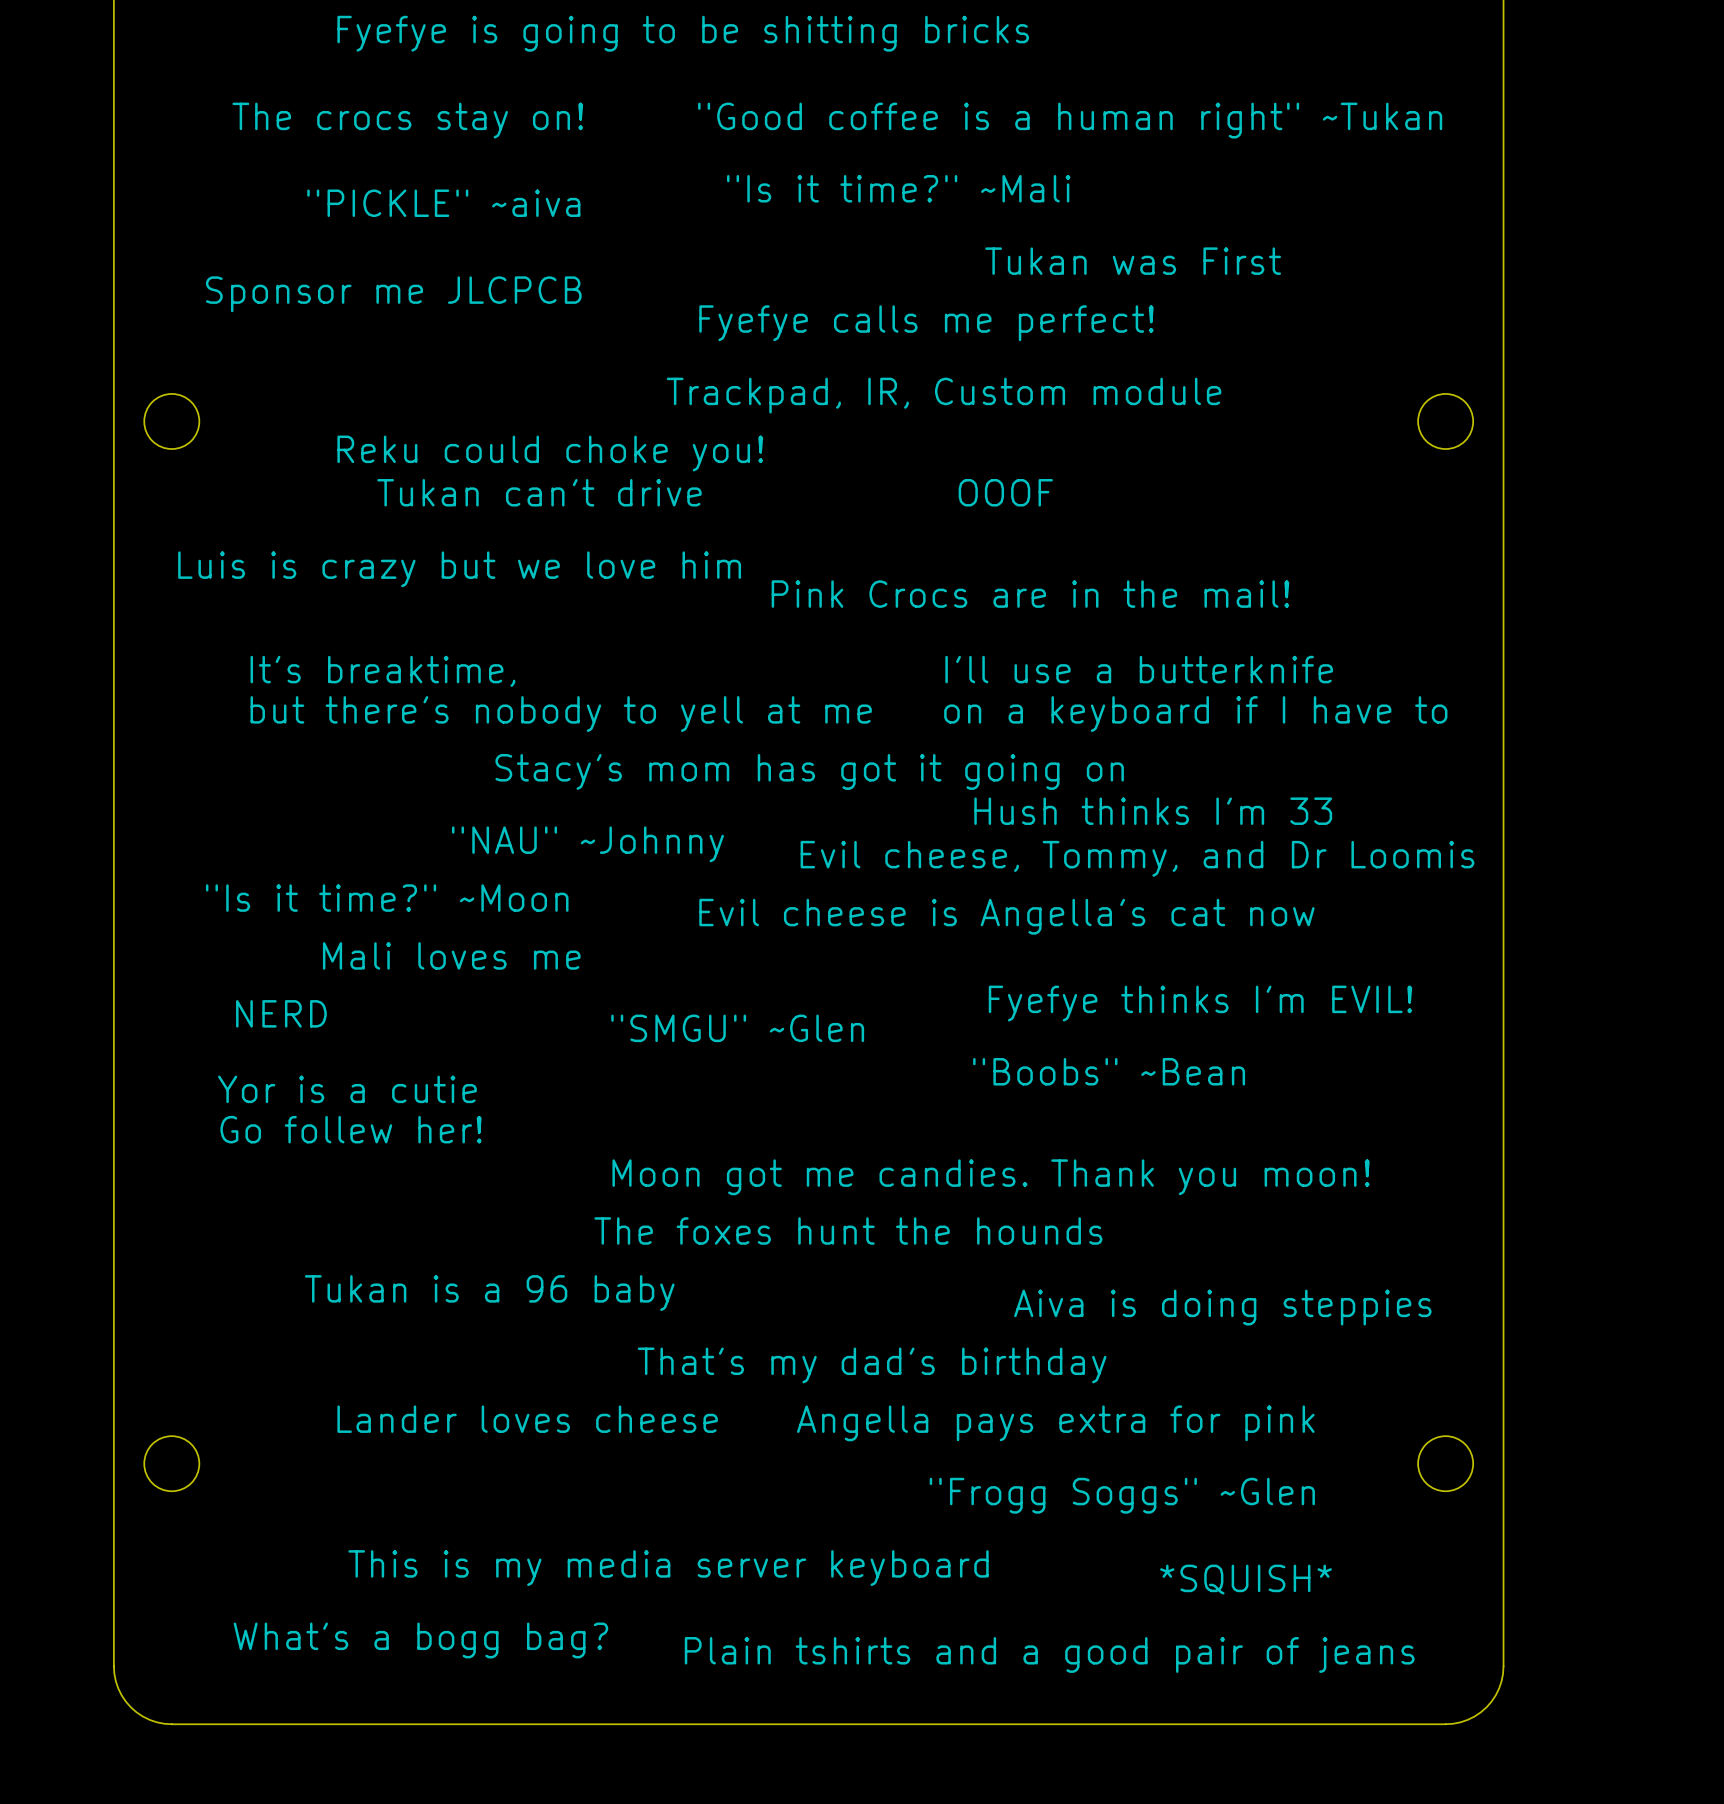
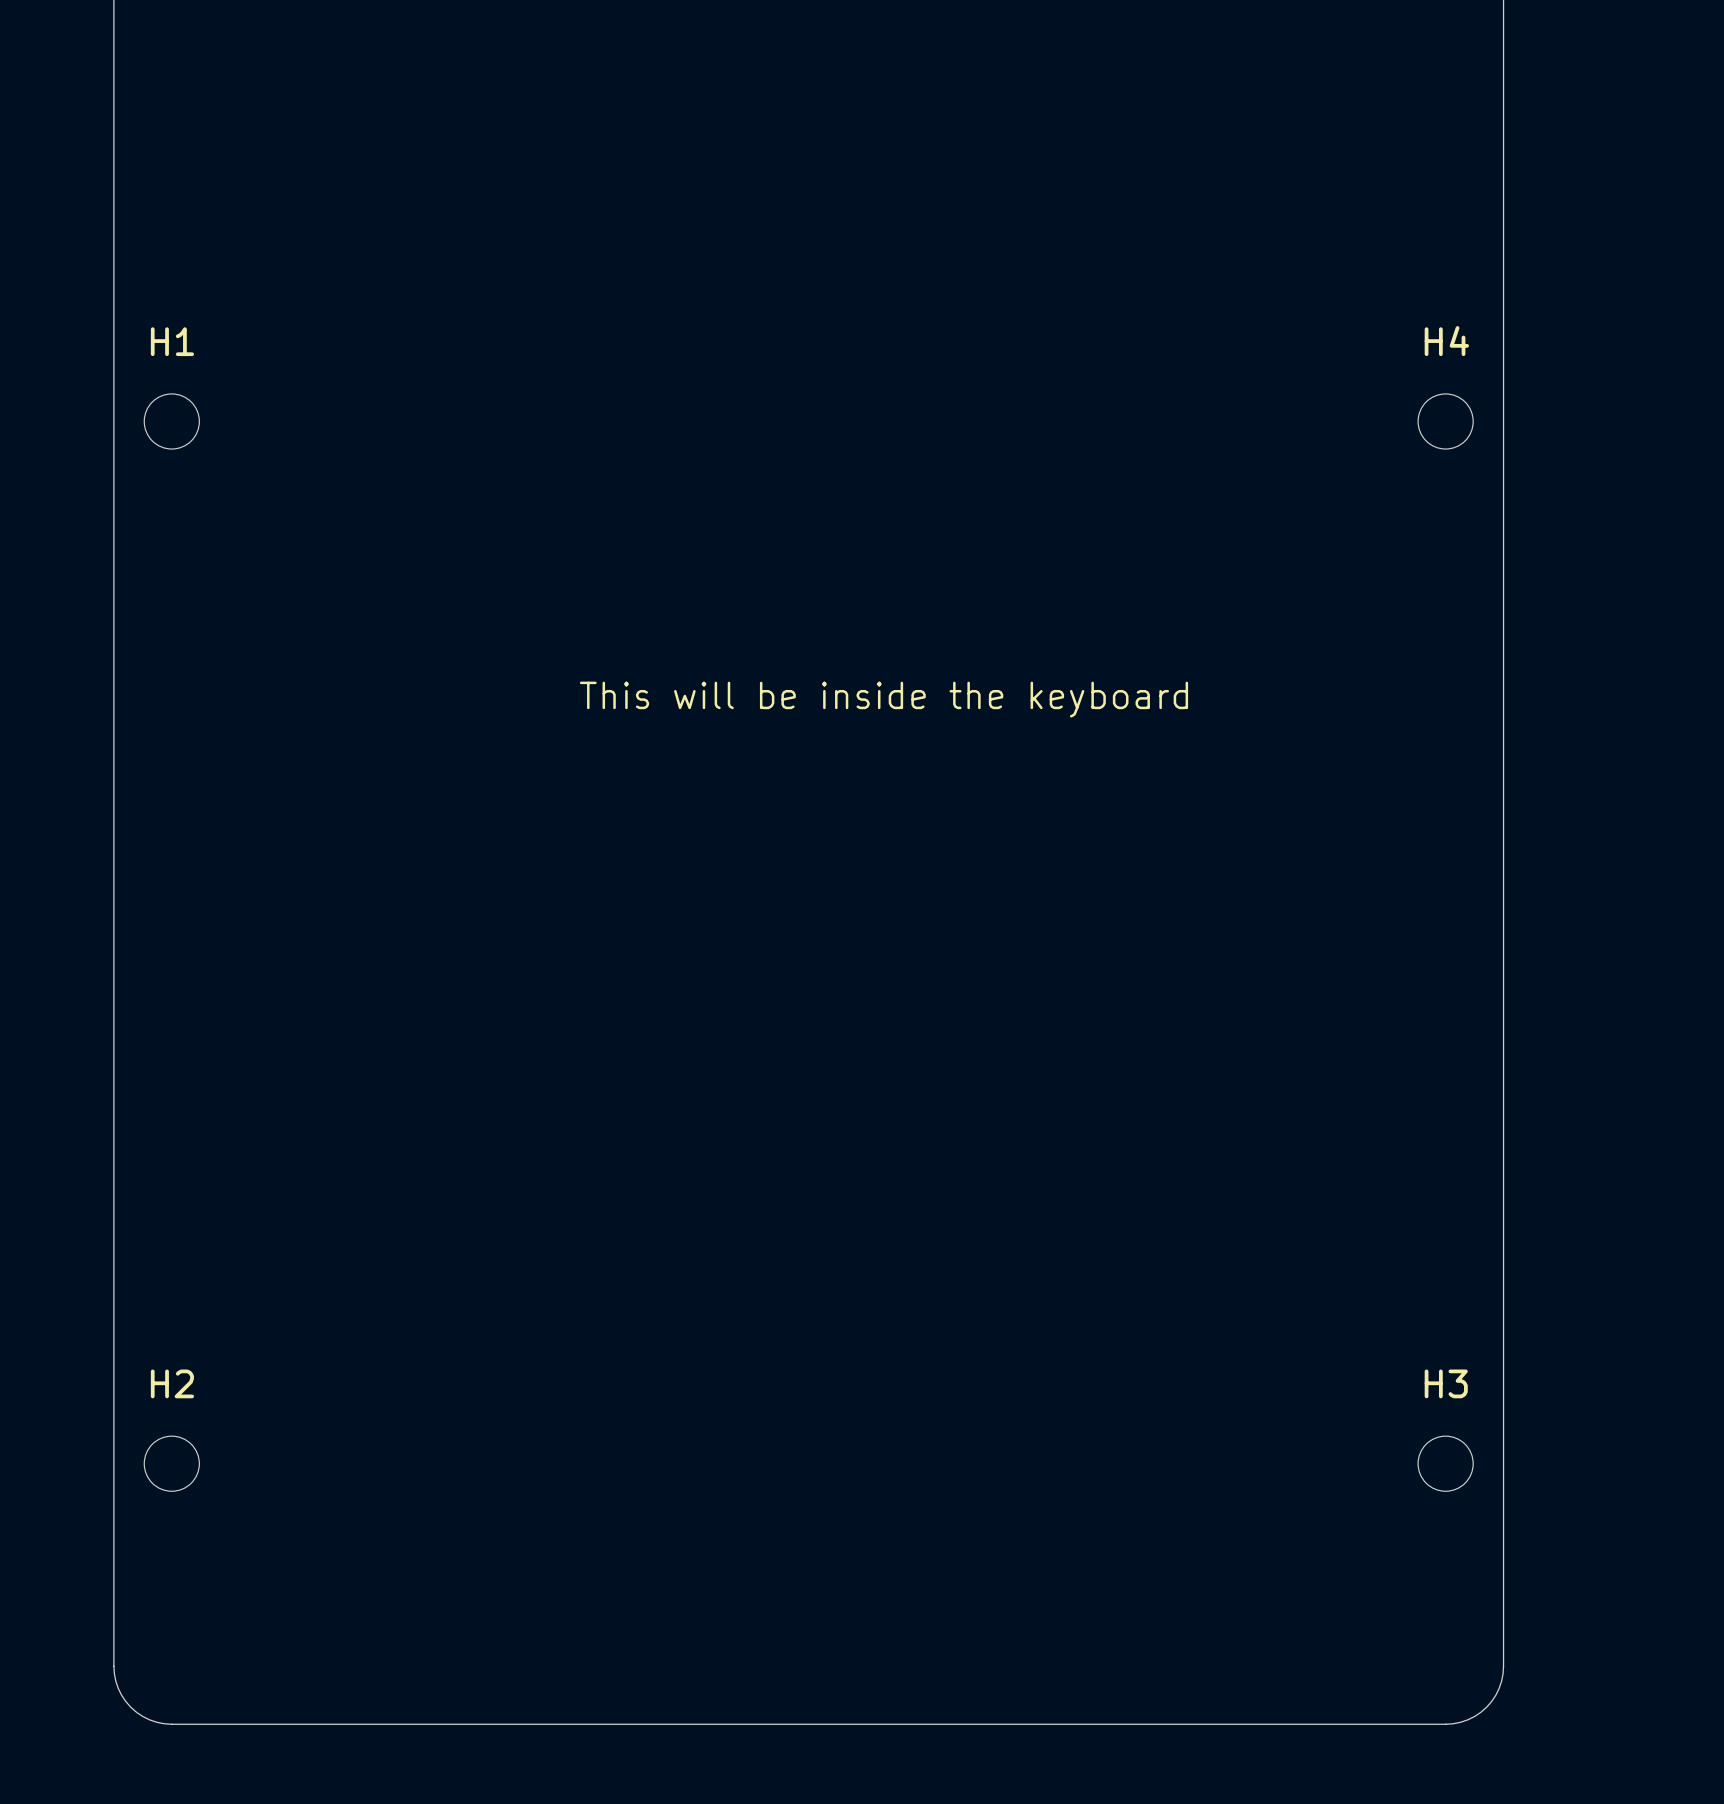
text: Fyefye is going to be shitting bricks (683, 33) -> none
text: The crocs stay on! (407, 120) -> none
text: "Good coffee is a human right" ~Tukan (1070, 120) -> none
text: "Is it time?" ~Mali (898, 188) -> none
text: "PICKLE" ~aiva (443, 203) -> none
text: Tukan was First (1133, 261) -> none
text: Sponsor me JLCPCB (393, 294) -> none
text: Fyefye calls me perfect! (926, 323) -> none
H1 name: none -> H1 (172, 341)
H4 name: none -> H4 (1446, 341)
text: Trackpad, IR, Custom module (944, 395) -> none
text: Reku could choke you! (550, 453) -> none
text: Tukan can't drive (539, 492) -> none
text: OOOF (1005, 492) -> none
text: Luis is crazy but we love him (459, 569) -> none
text: Pink Crocs are in the mail! (1030, 594) -> none
text: I'll use a butterknife (1139, 669) -> none
text: It's breaktime, (382, 671) -> none
text: none -> This will be inside the keyboard (883, 699)
text: but there's nobody to yell at me (561, 714) -> none
text: on a keyboard if I have to (1195, 714) -> none
text: Stacy's mom has got it going on (809, 771) -> none
text: Hush thinks I'm 33 (1153, 811) -> none
text: "NAU" ~Johnny (587, 844) -> none
text: Evil cheese, Tommy, and Dr Loomis (1137, 858) -> none
text: "Is it time?" ~Moon (387, 898) -> none
text: Evil cheese is Angella's cat now (1006, 916) -> none
text: Mali loves me (451, 955) -> none
text: Fyefye thinks I'm EVIL! (1200, 1003) -> none
text: NERD (281, 1013) -> none
text: "SMGU" ~Glen (737, 1028) -> none
text: "Boobs" ~Bean (1109, 1071) -> none
text: Yor is a cutie (347, 1089) -> none
text: Go follew her! (351, 1129) -> none
text: Moon got me candies. Thank you moon! (991, 1177) -> none
text: The foxes hunt the hounds (848, 1230) -> none
text: Tukan is a 96 baby (489, 1293) -> none
text: Aiva is doing steppies (1222, 1307) -> none
text: That's my dad's birthday (872, 1365) -> none
H2 name: none -> H2 (172, 1383)
H3 name: none -> H3 (1446, 1383)
text: Lander loves cheese (527, 1419) -> none
text: Angella pays extra for pink (1055, 1423) -> none
text: "Frogg Soggs" ~Glen (1122, 1495) -> none
text: This is my media server keyboard (668, 1568) -> none
text: *SQUISH* (1246, 1579) -> none
text: What's a bogg bag? (420, 1640) -> none
text: Plain tshirts and a good pair of jeans (1049, 1654) -> none

